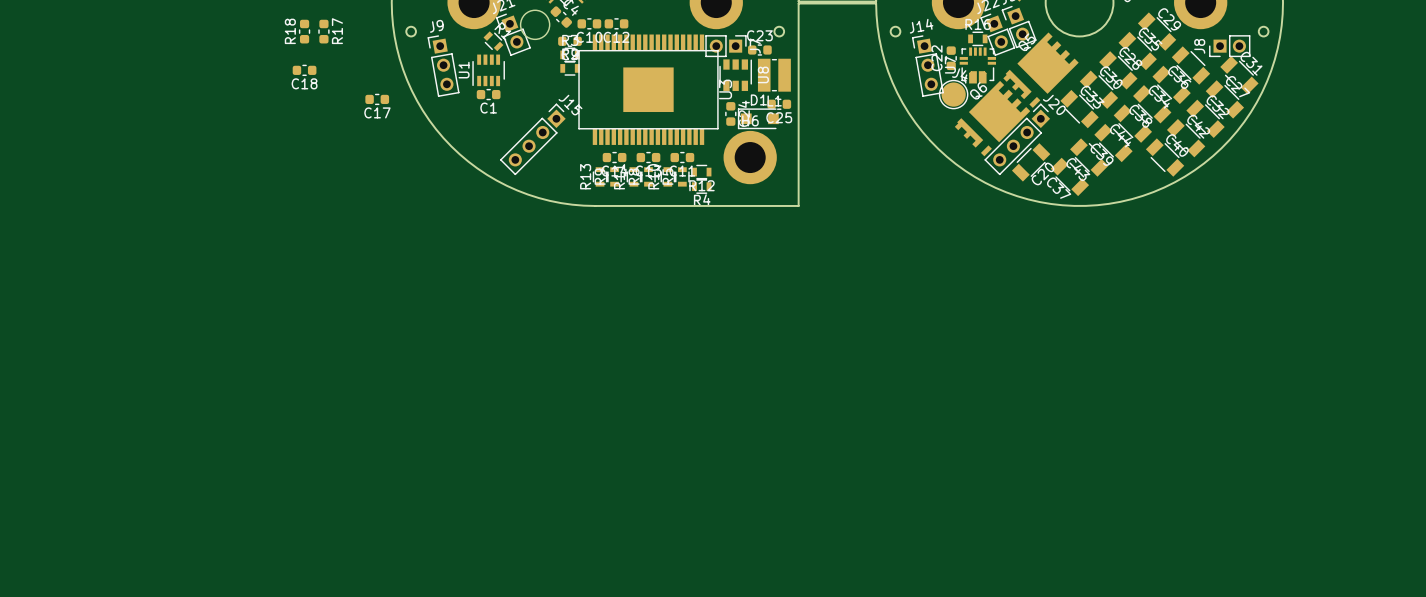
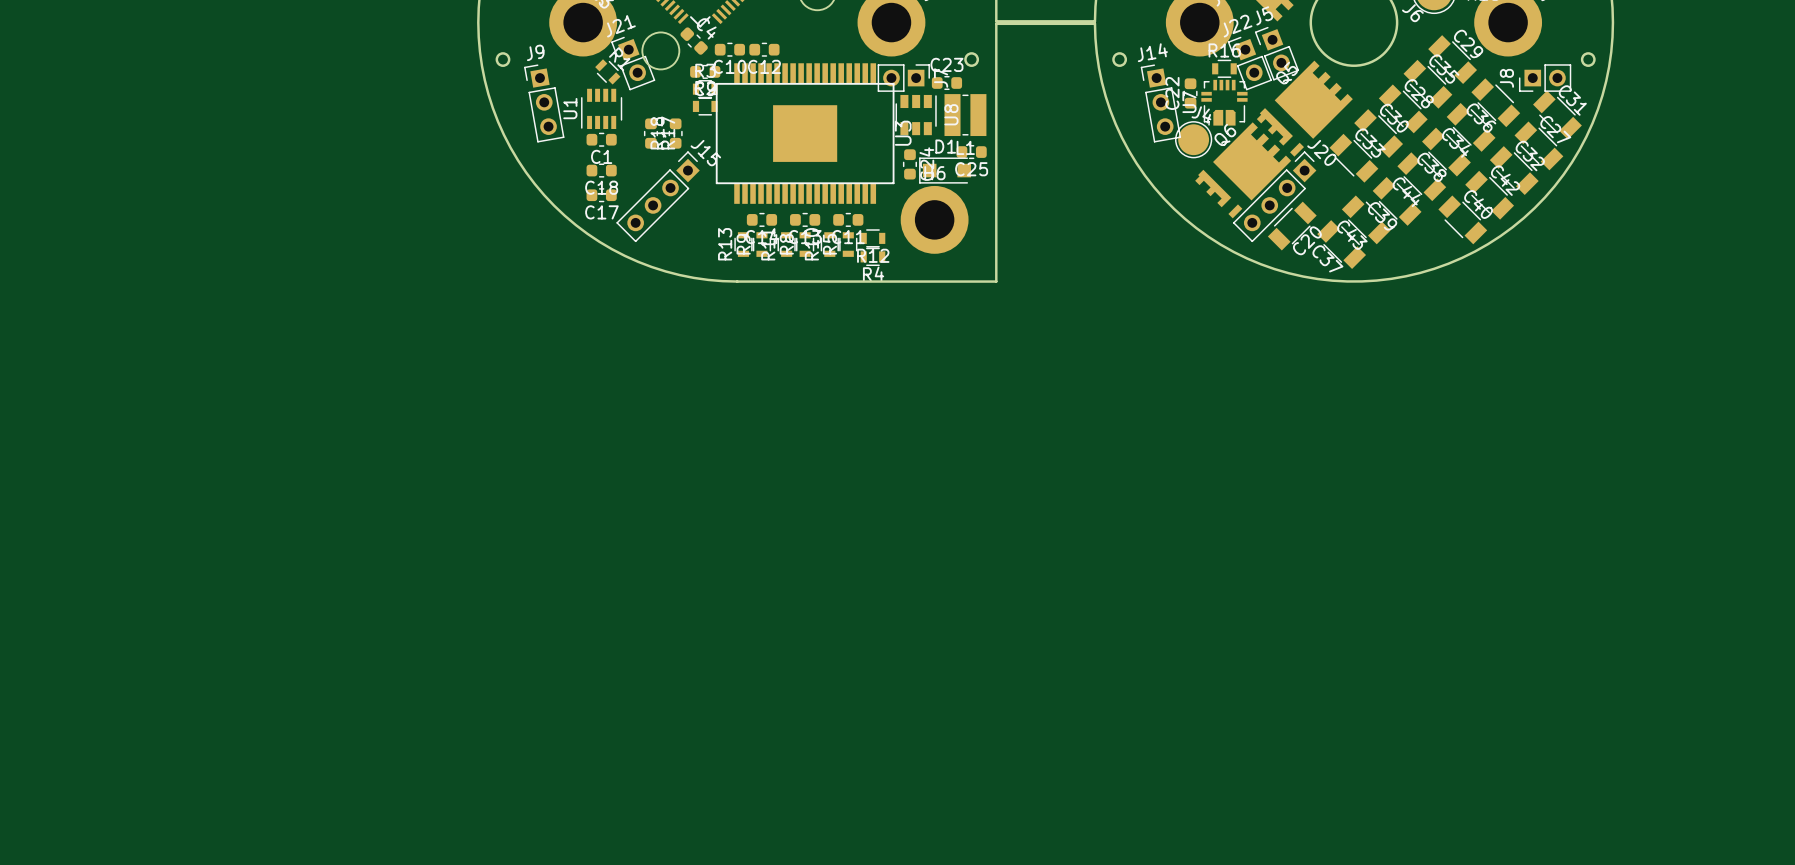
R18 position: (304, 31) -> (675, 133)
R17 position: (323, 31) -> (650, 133)
C18 position: (304, 70) -> (601, 170)
C17 position: (377, 99) -> (601, 195)

